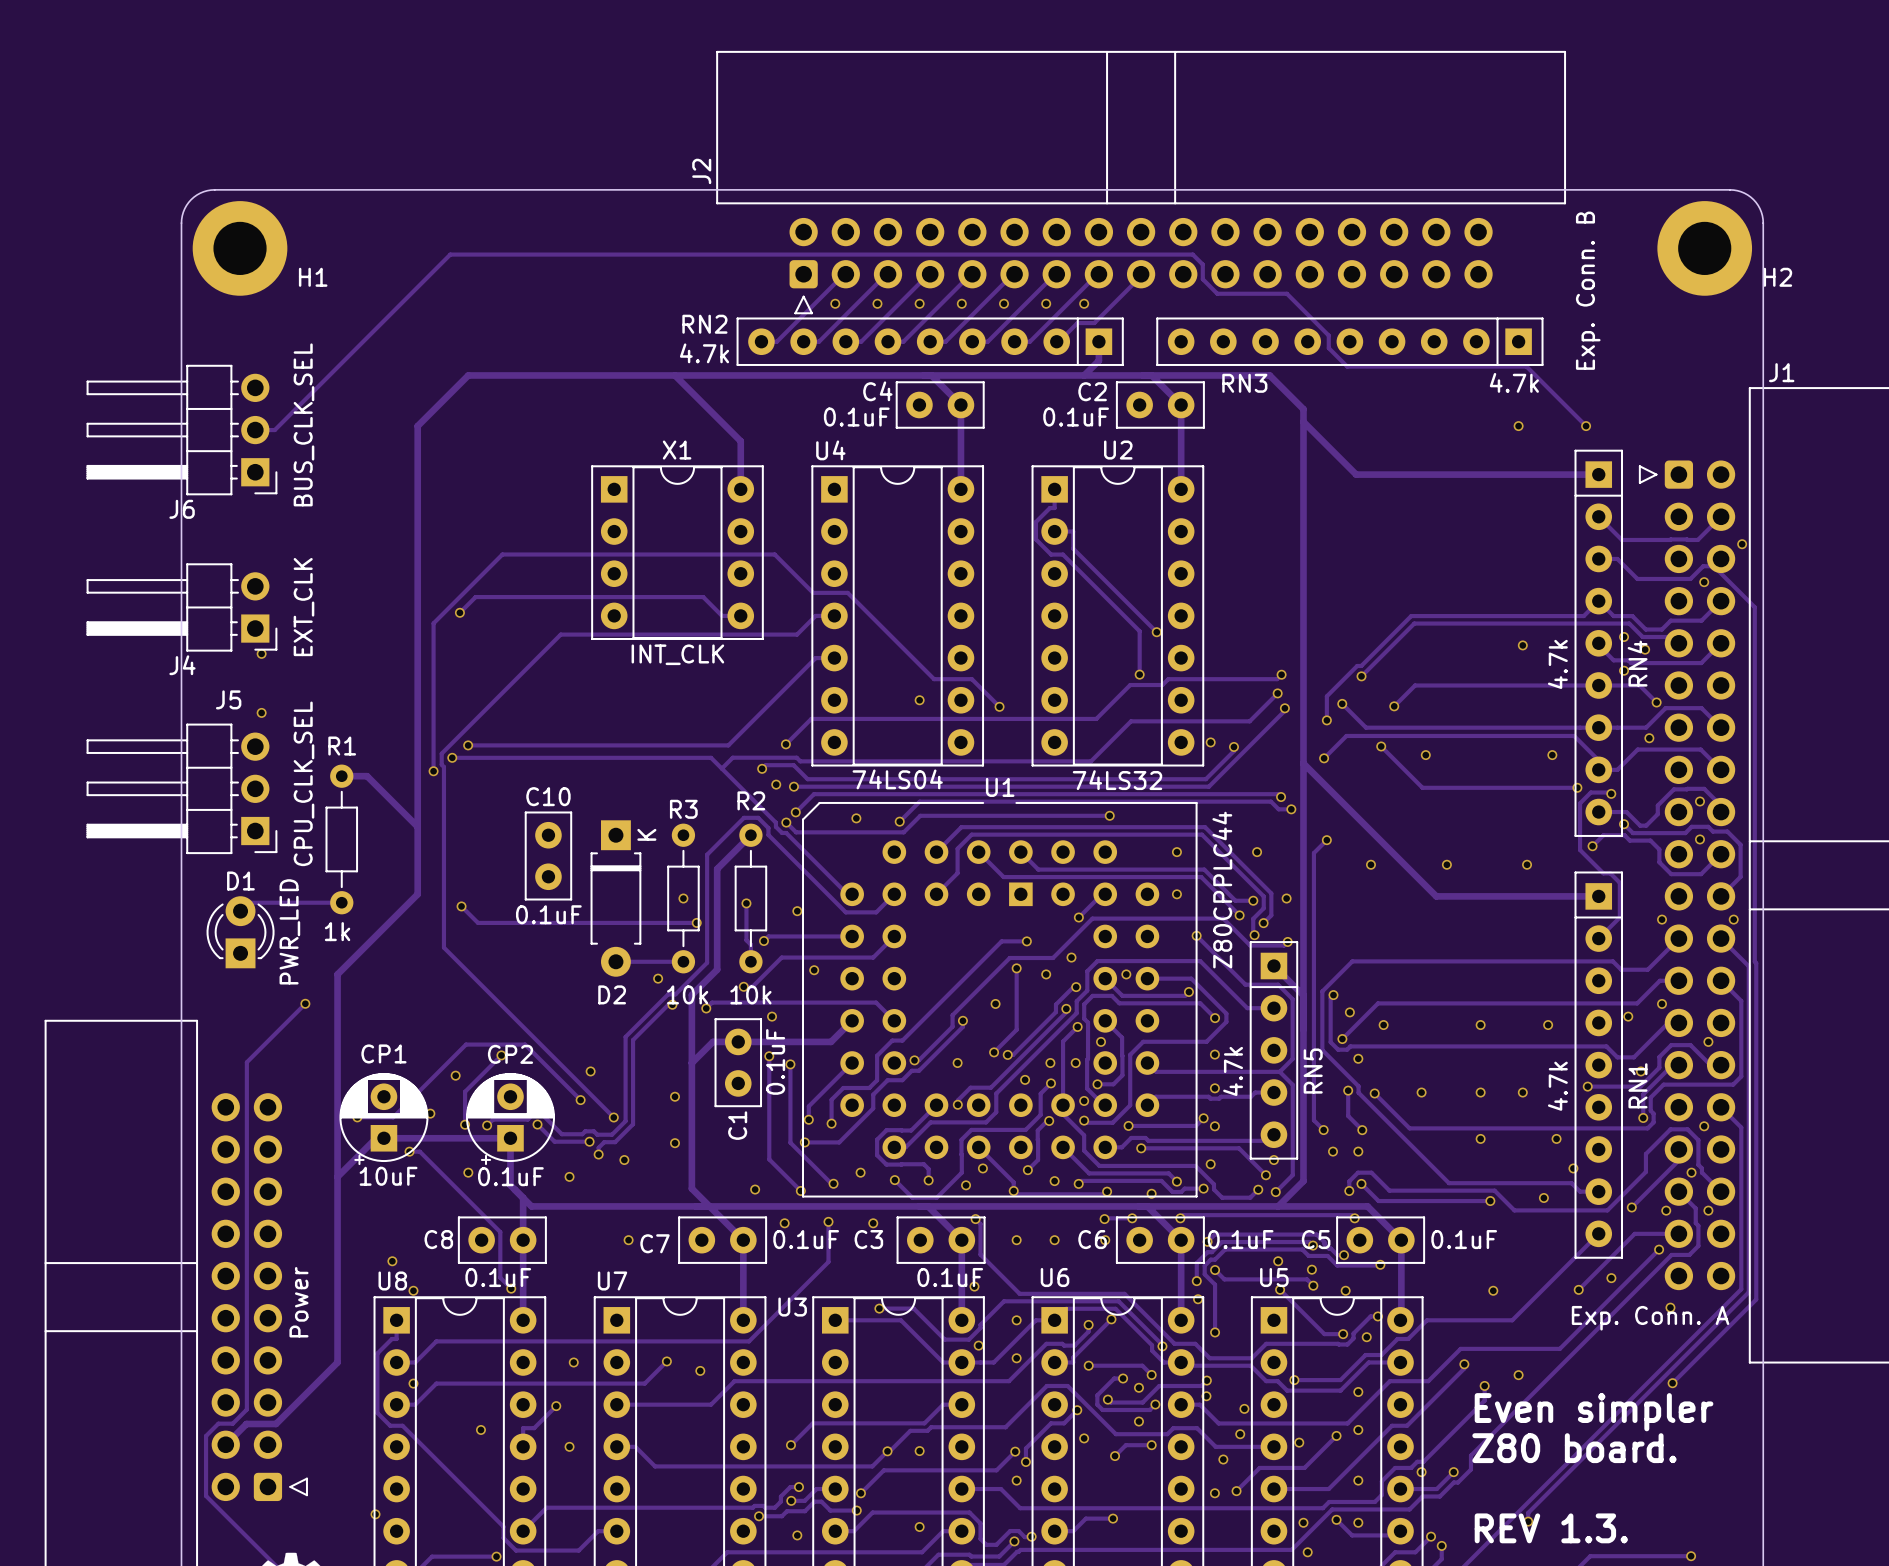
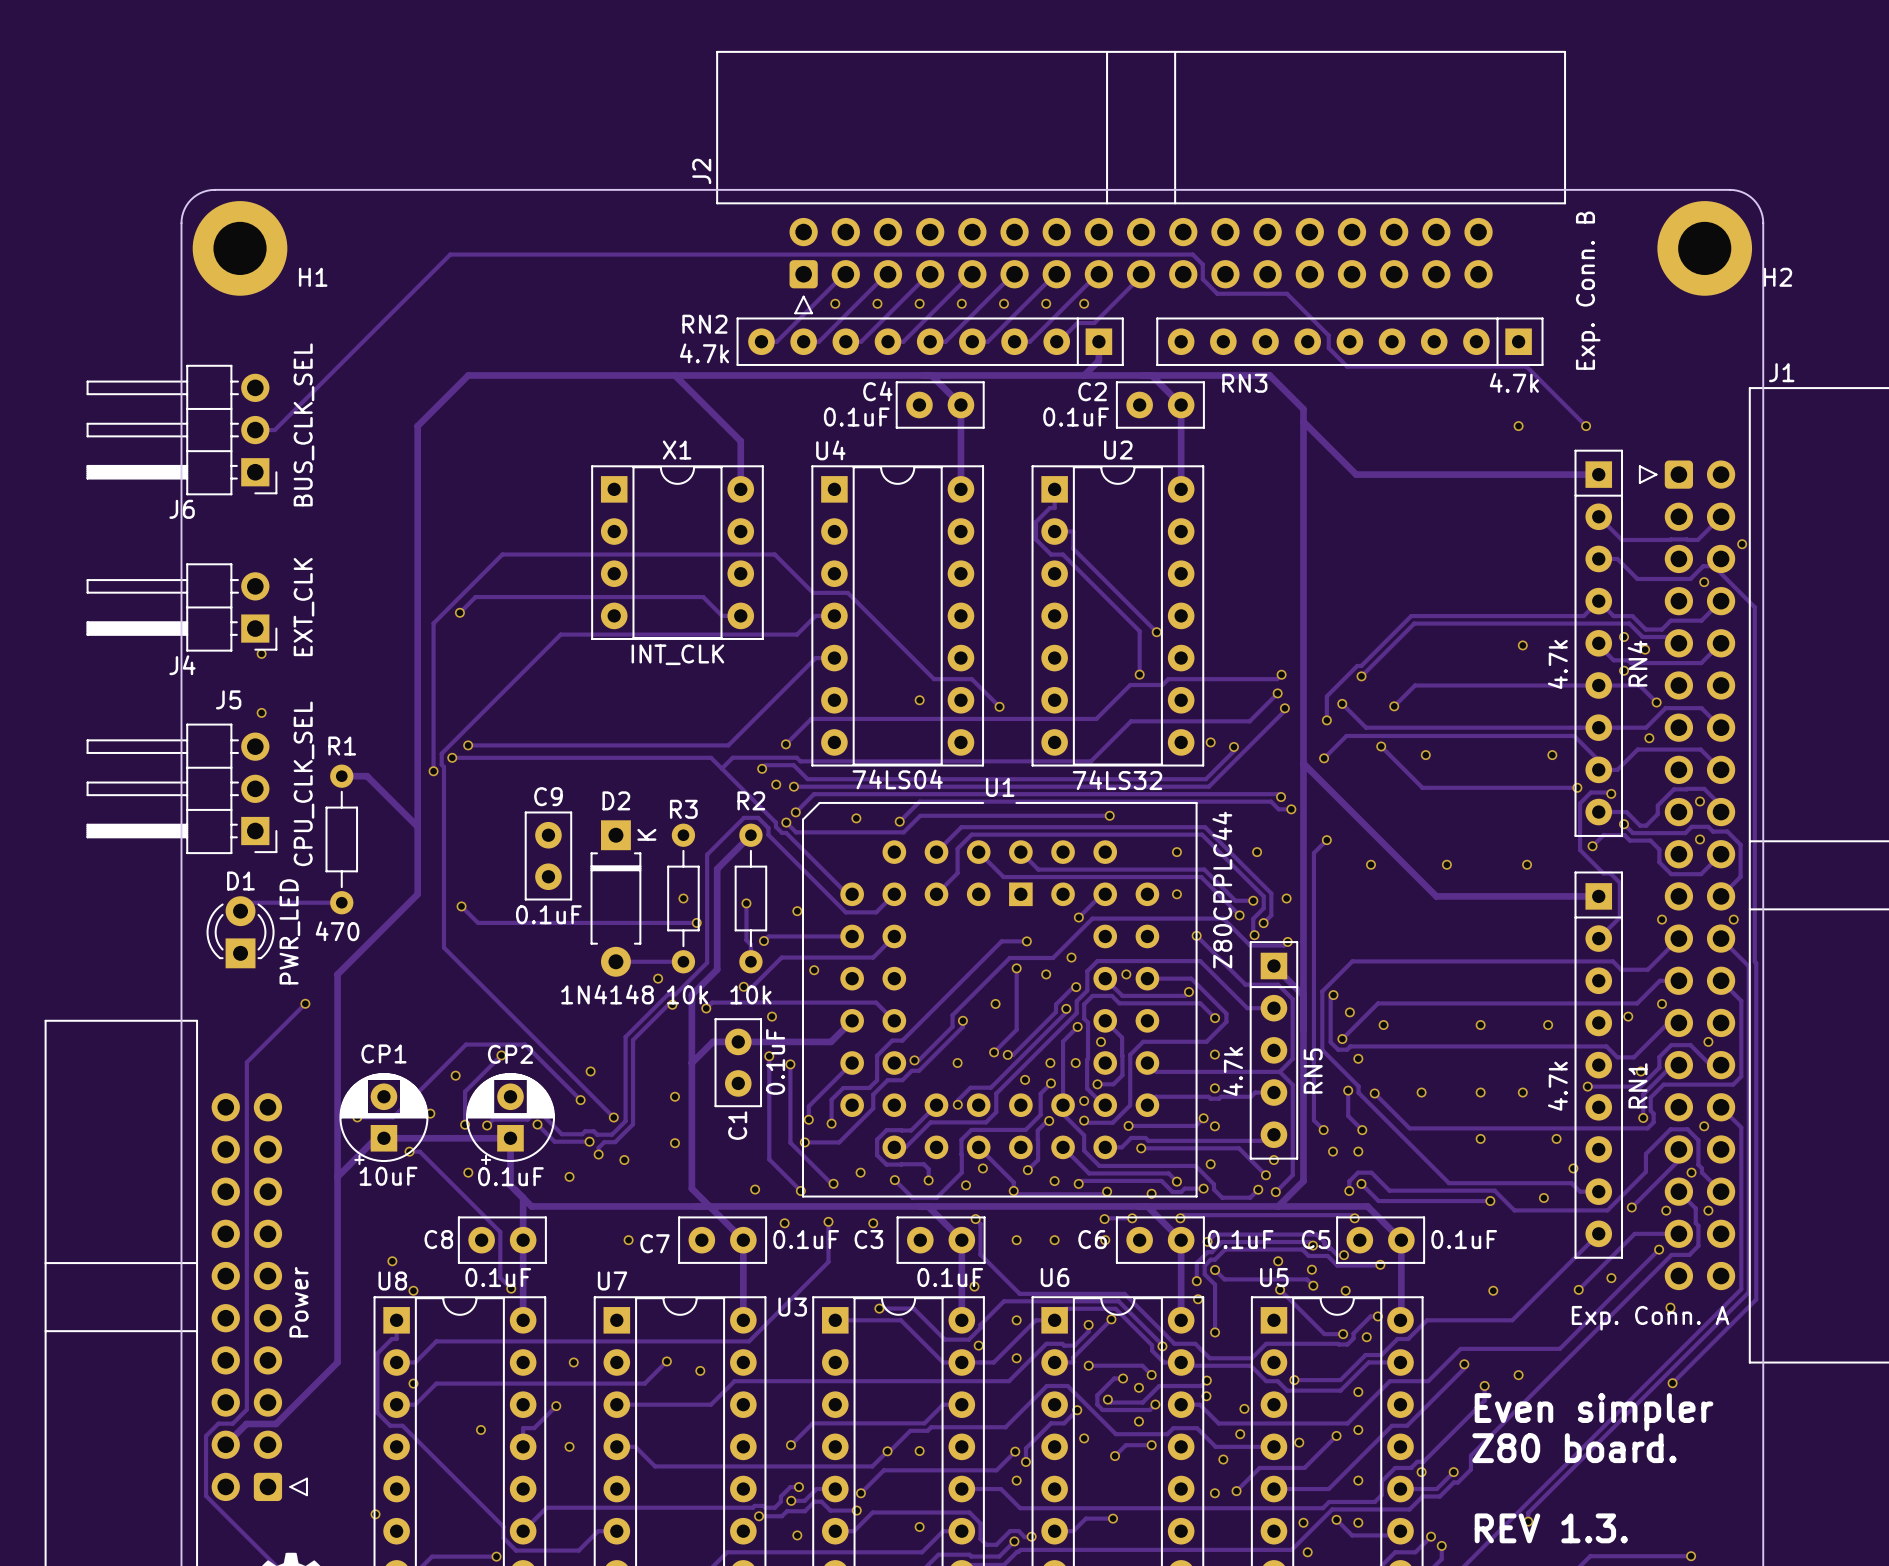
C10 name: C10 (548, 796) -> C9 (548, 796)
R1 value: 1k (337, 931) -> 470 (337, 931)
D2 value: none -> 1N4148 (607, 994)
D2 name position: D2 (612, 994) -> D2 (616, 800)

